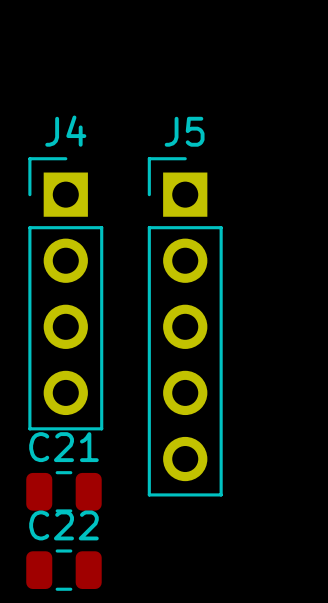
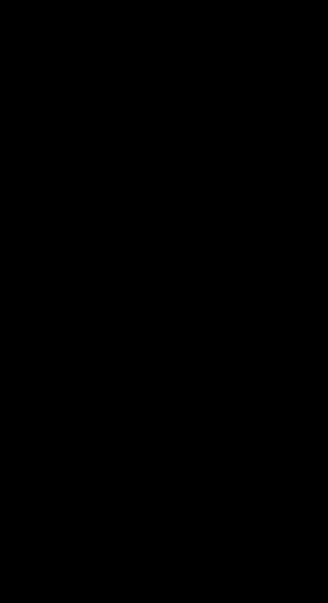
J4: (65, 293) -> none
J5: (185, 326) -> none
C21: (63, 491) -> none
C22: (63, 570) -> none

